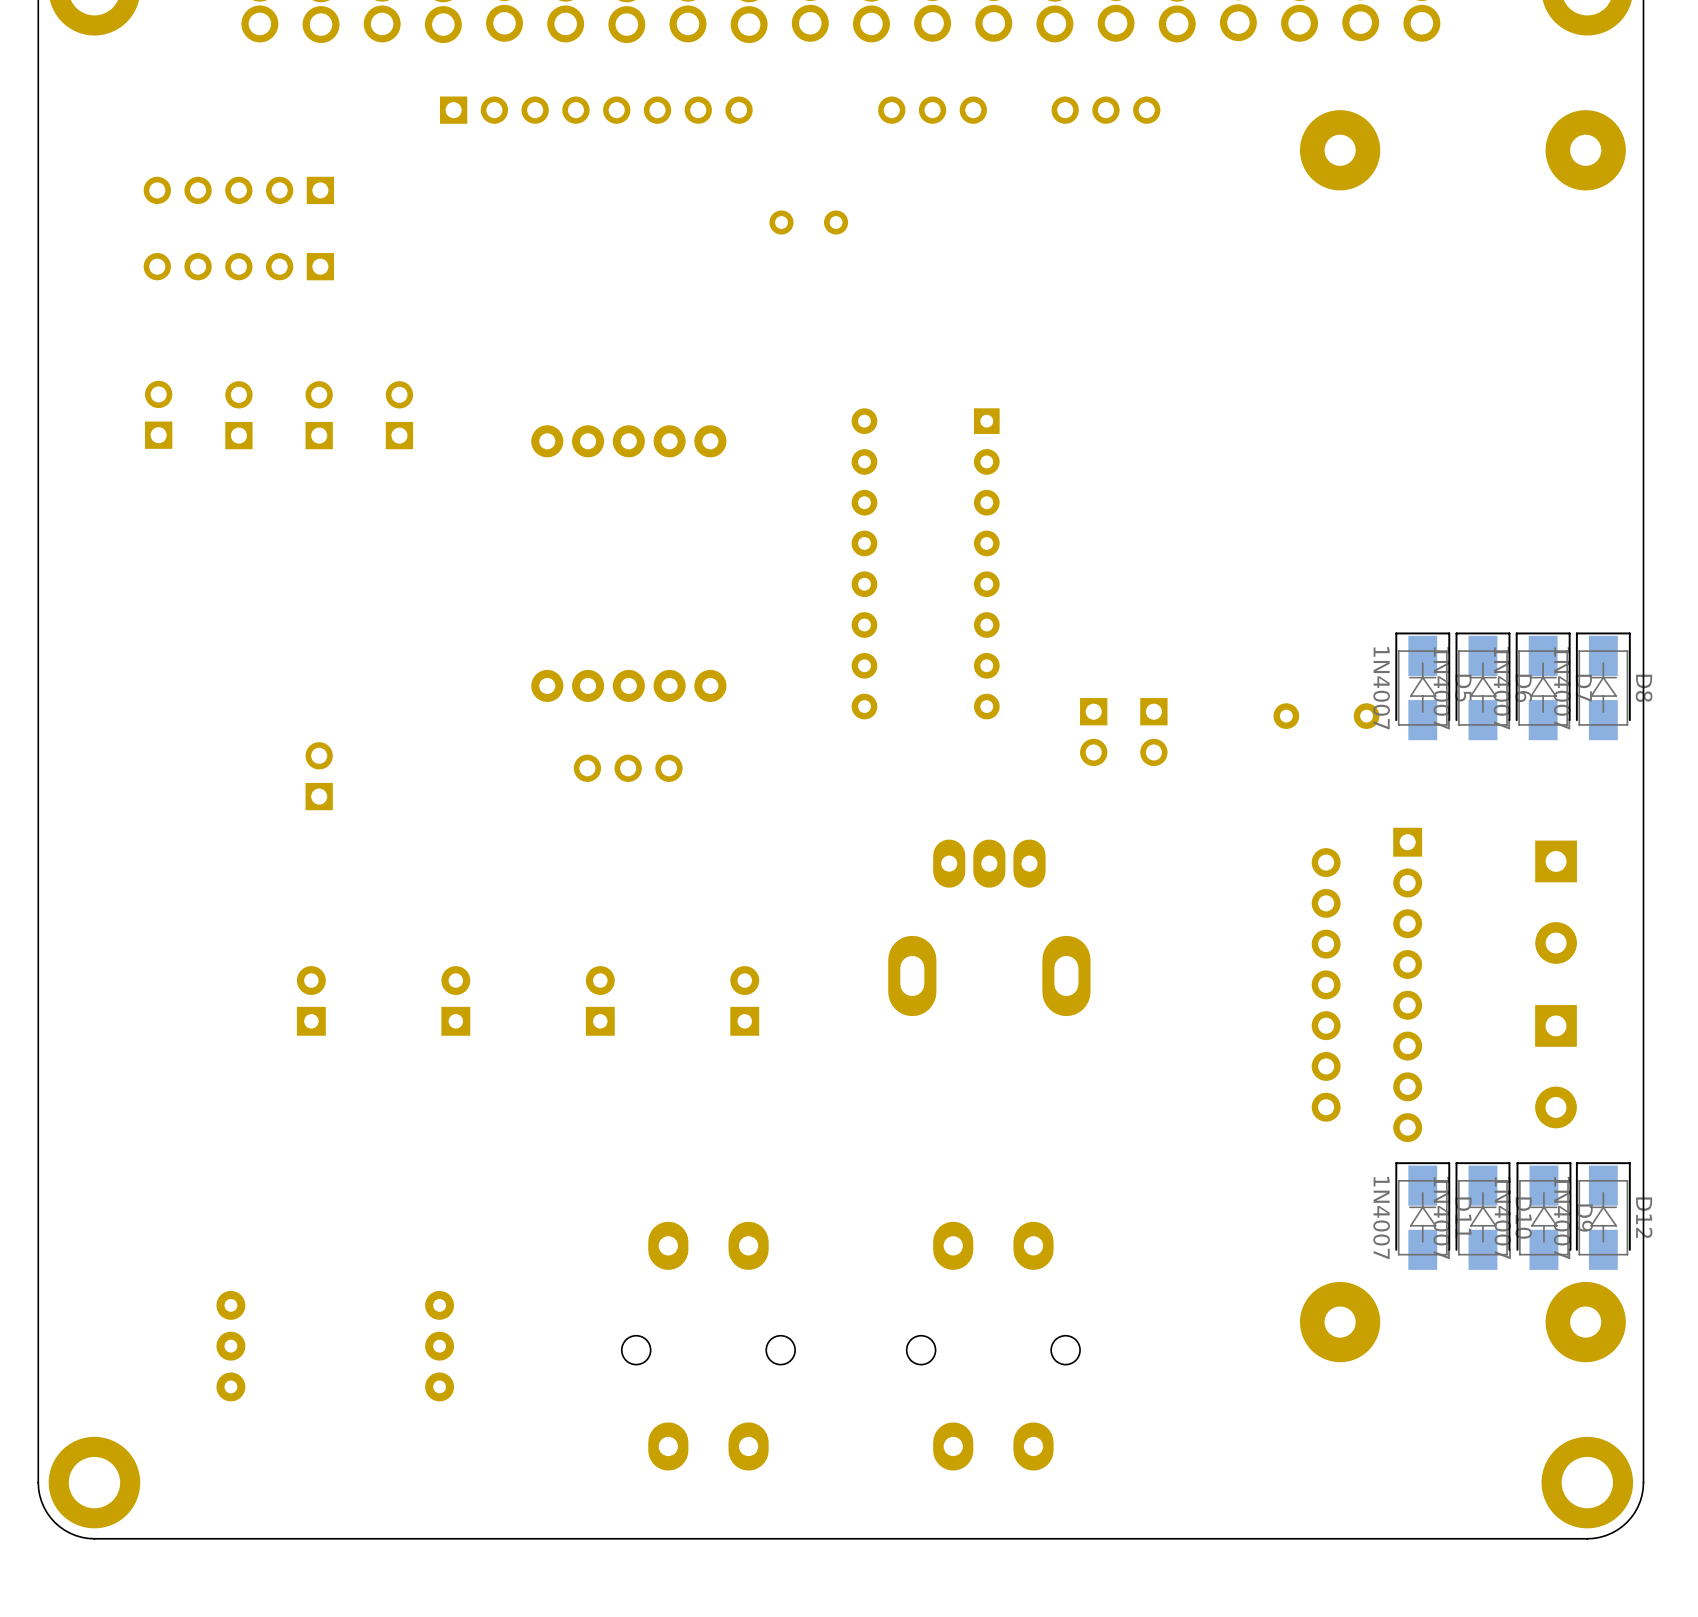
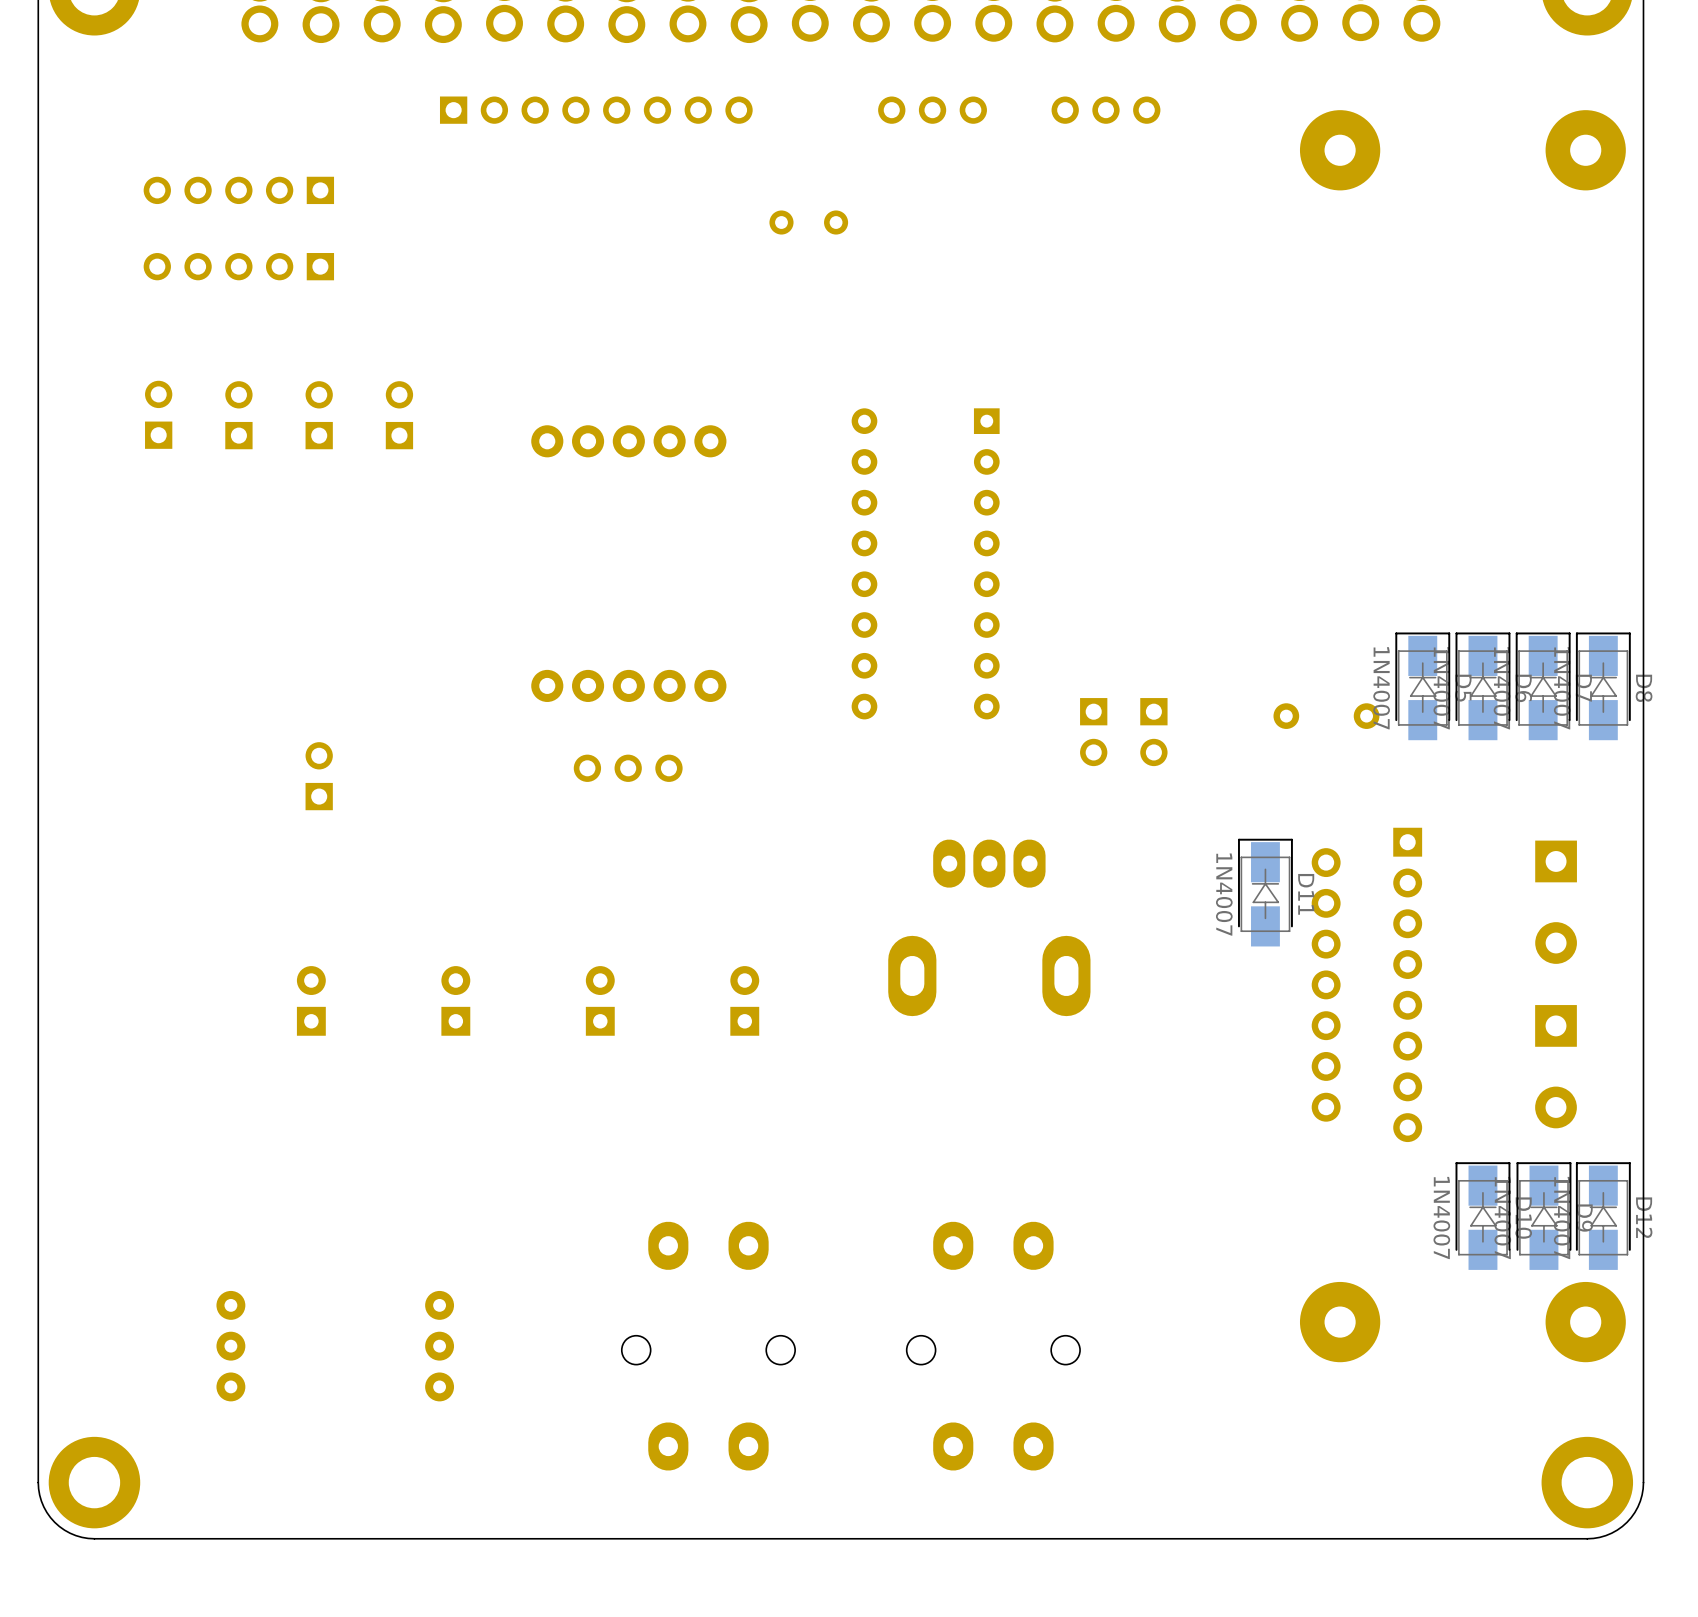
D11 position: (1422, 1216) -> (1265, 892)

